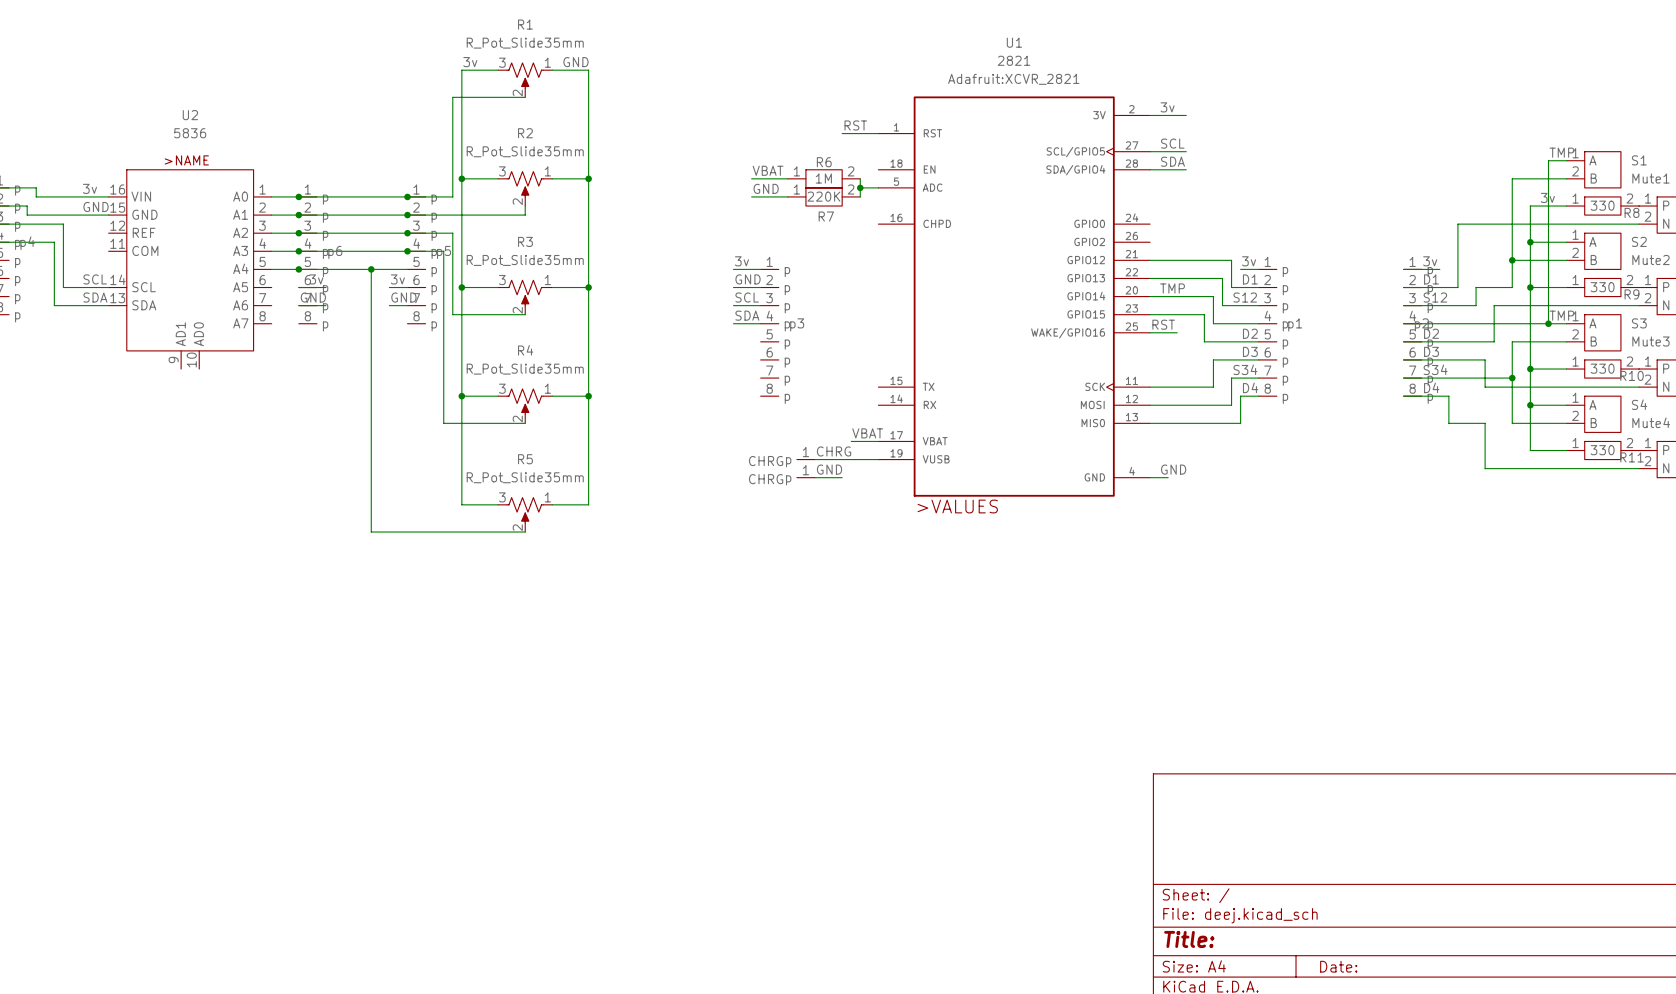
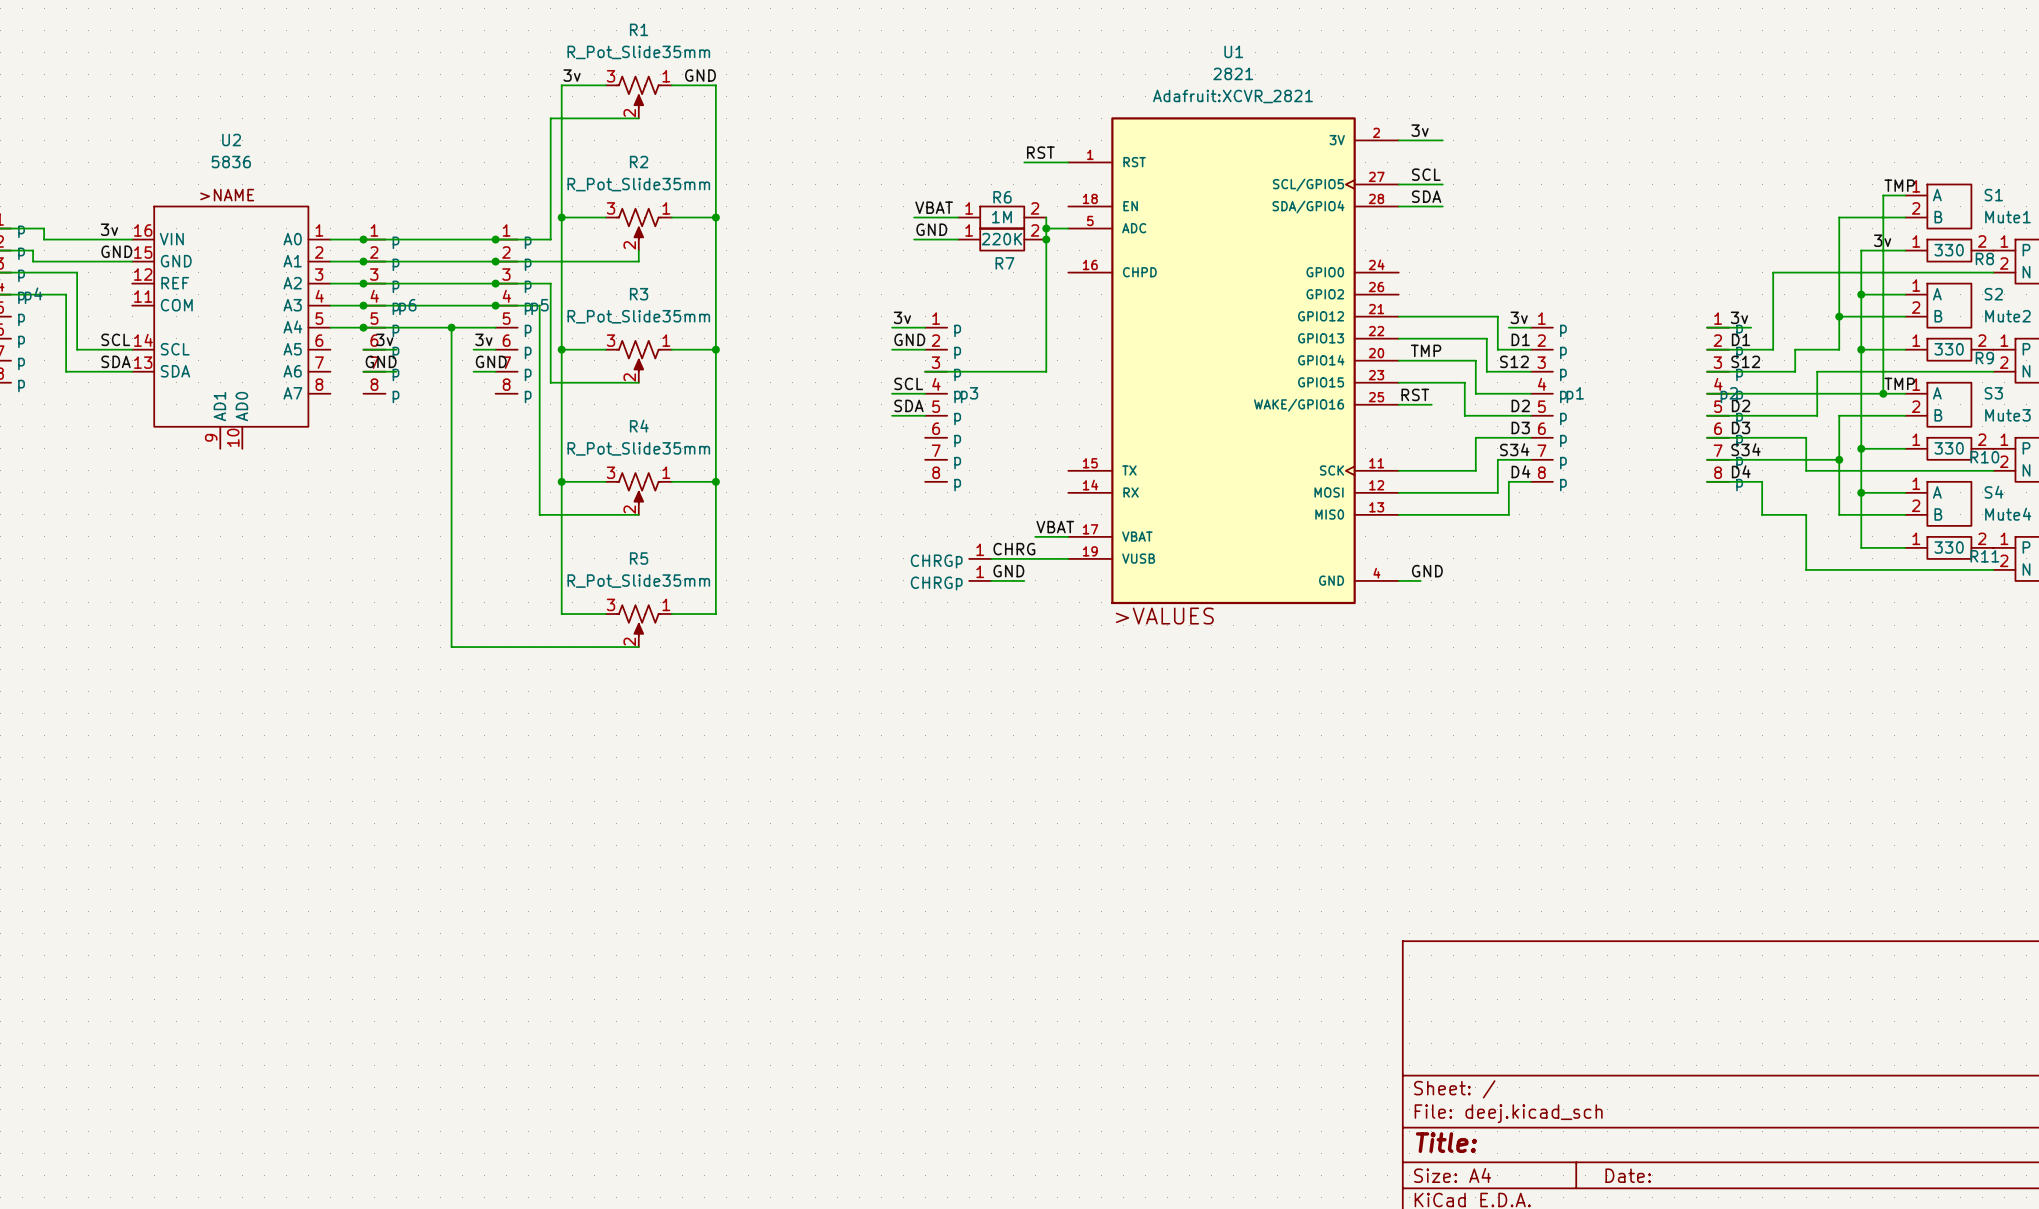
junction: none -> (1046, 239)
label: SCL (747, 297) -> none
wire: (733, 305) (760, 305) -> (1046, 239) (1046, 371) (925, 371)
label: SDA (747, 315) -> SCL (908, 383)
label: none -> SDA (908, 405)
wire: none -> (892, 415) (925, 415)

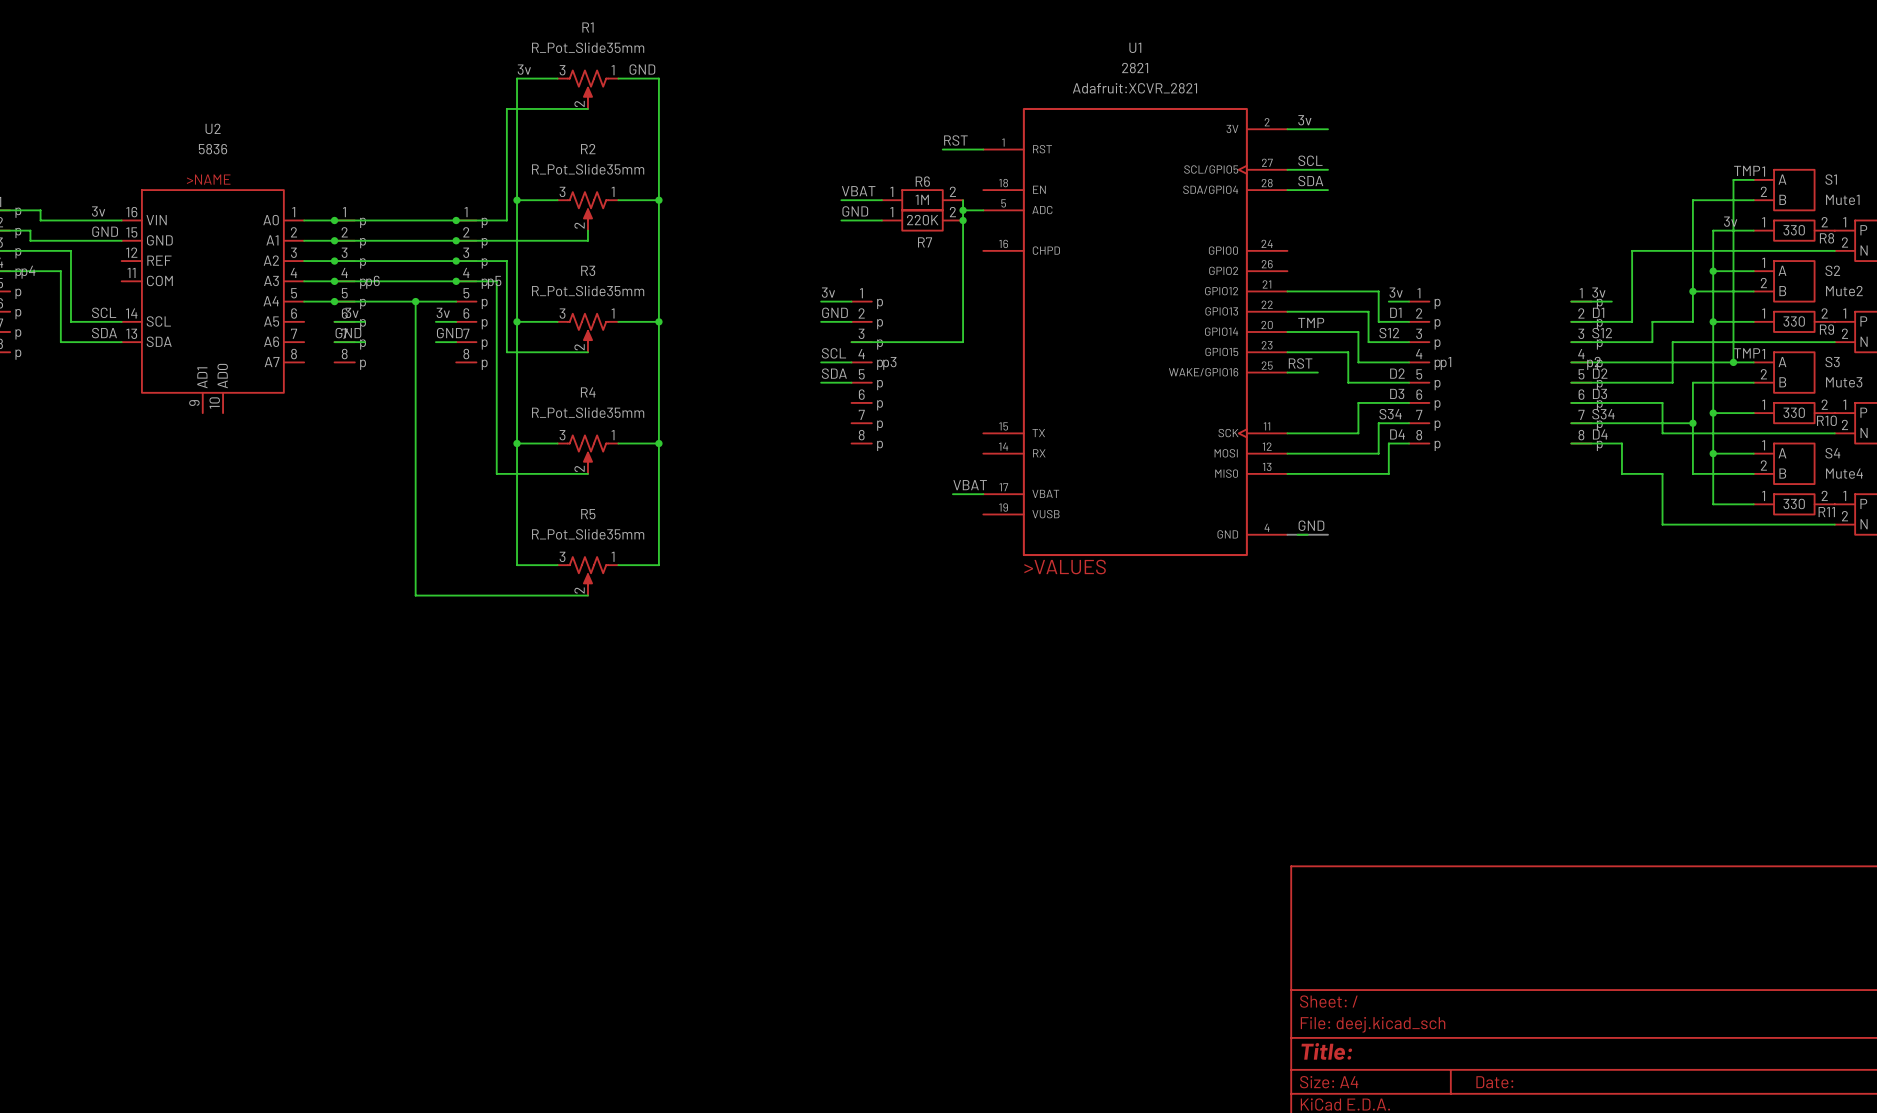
label: CHRG (1014, 549) -> none
part: CHRG (980, 558) -> none
wire: (991, 558) (1068, 558) -> none
label: GND (1008, 571) -> none
part: CHRG (980, 580) -> none
wire: (991, 580) (1024, 580) -> none
bus: none -> (1287, 534) (1327, 534)

